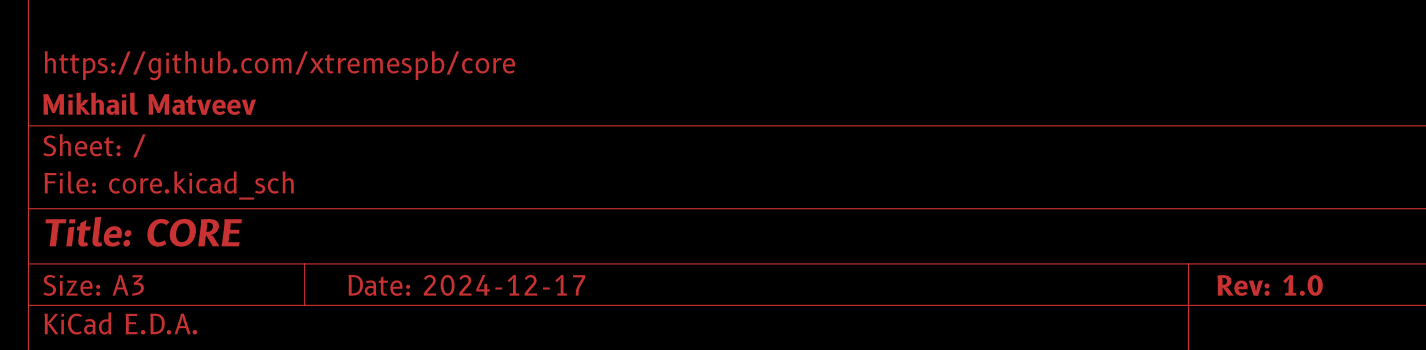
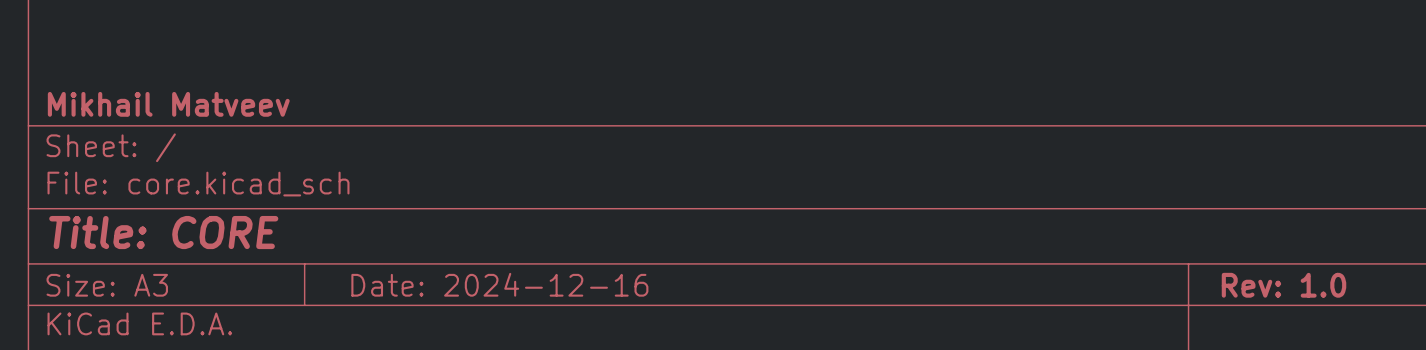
title block: https://github.com/xtremespb/core (279, 65) -> none
title block: Date: 2024-12-17 (466, 285) -> Date: 2024-12-16 (499, 284)

